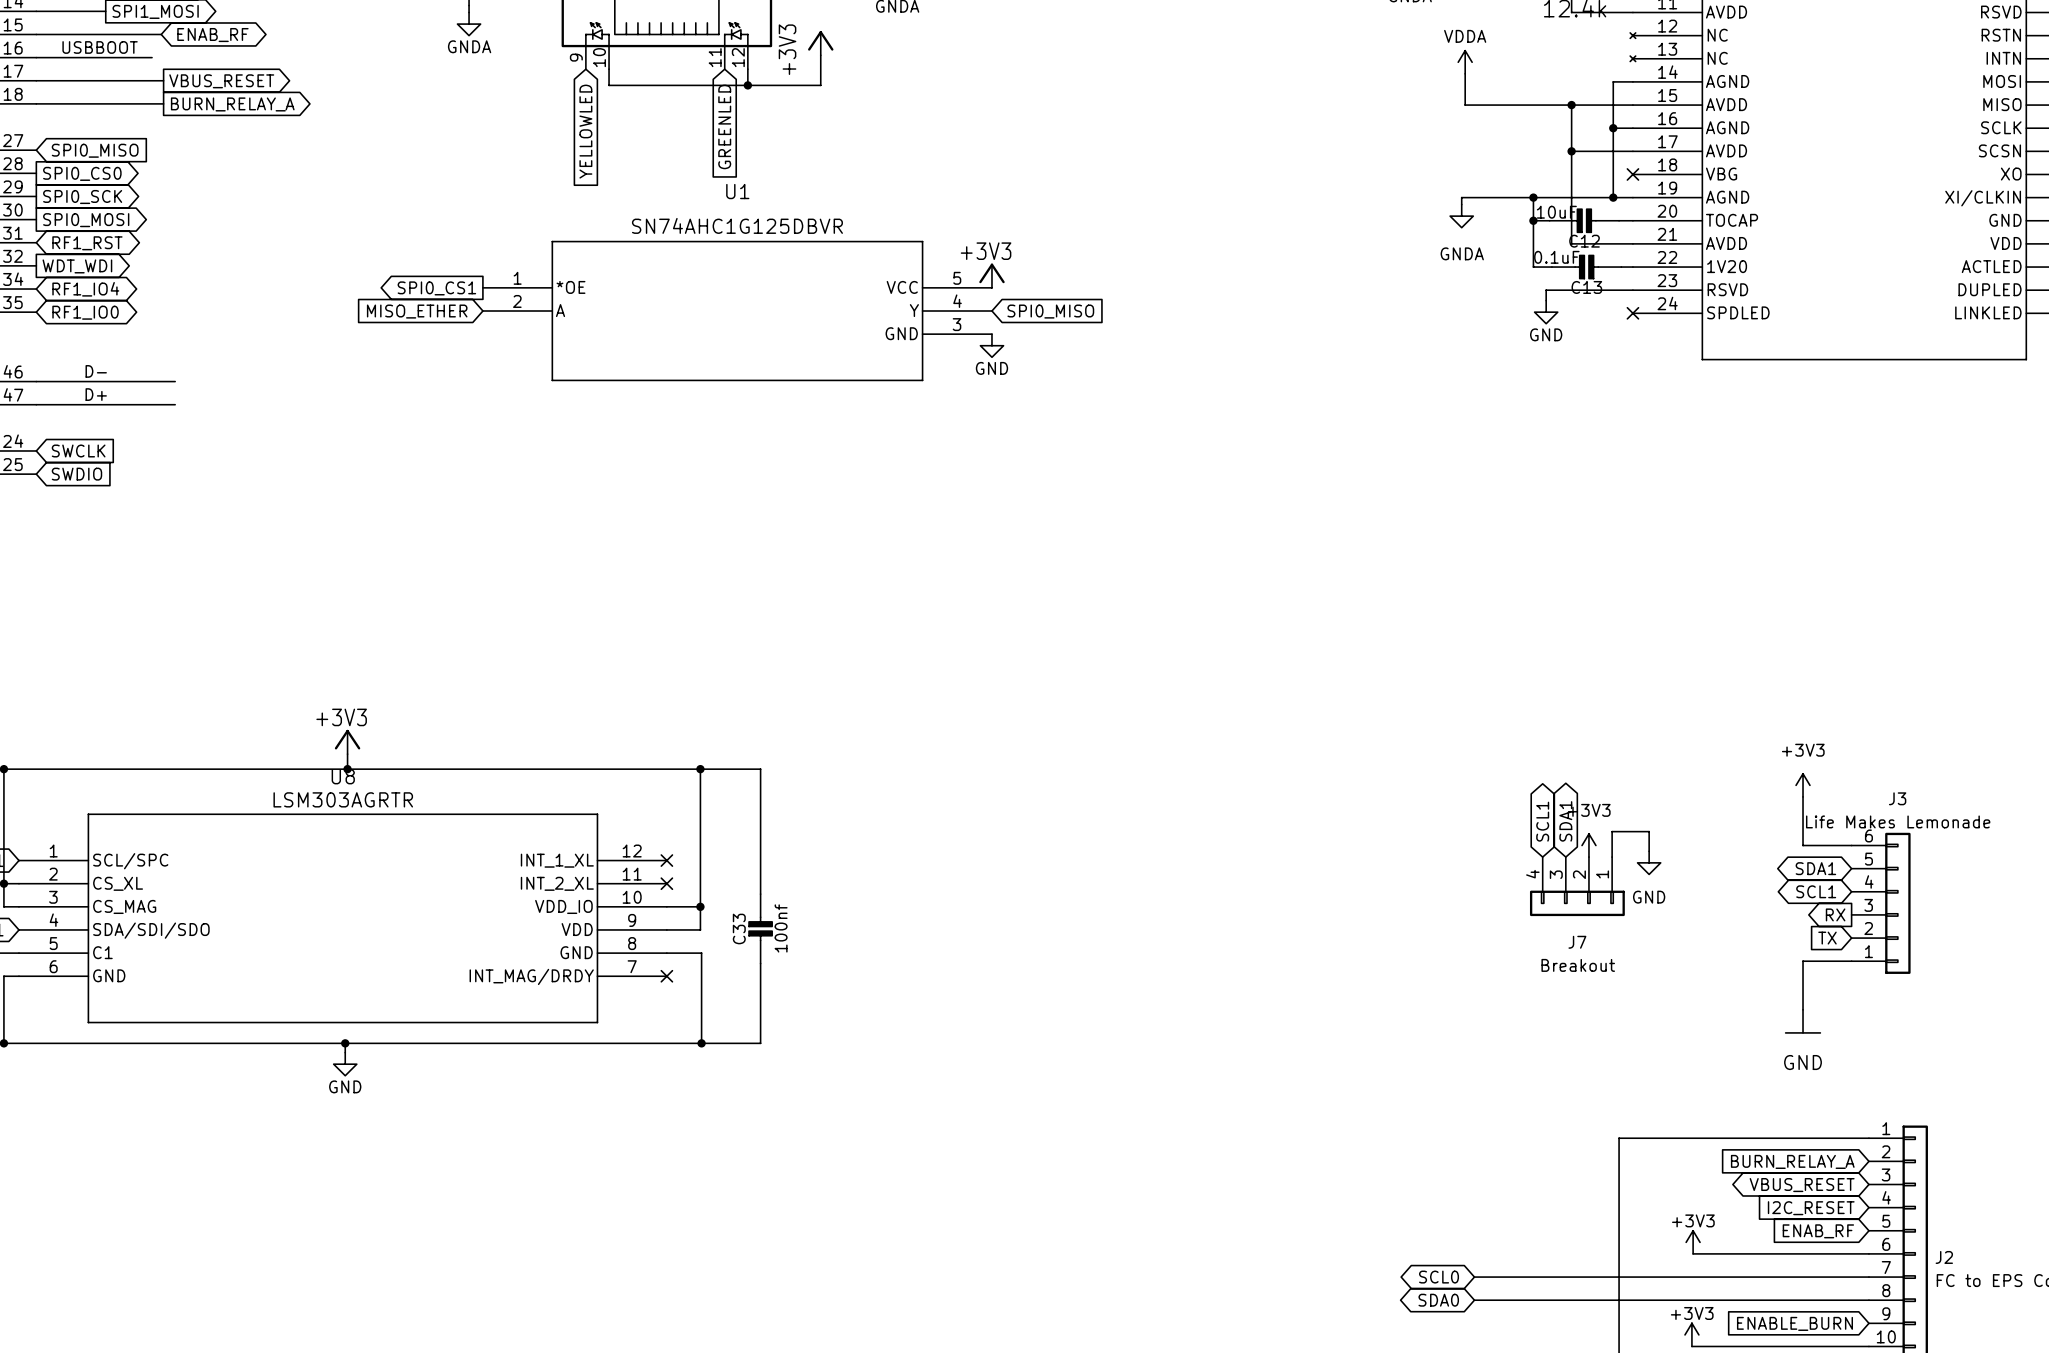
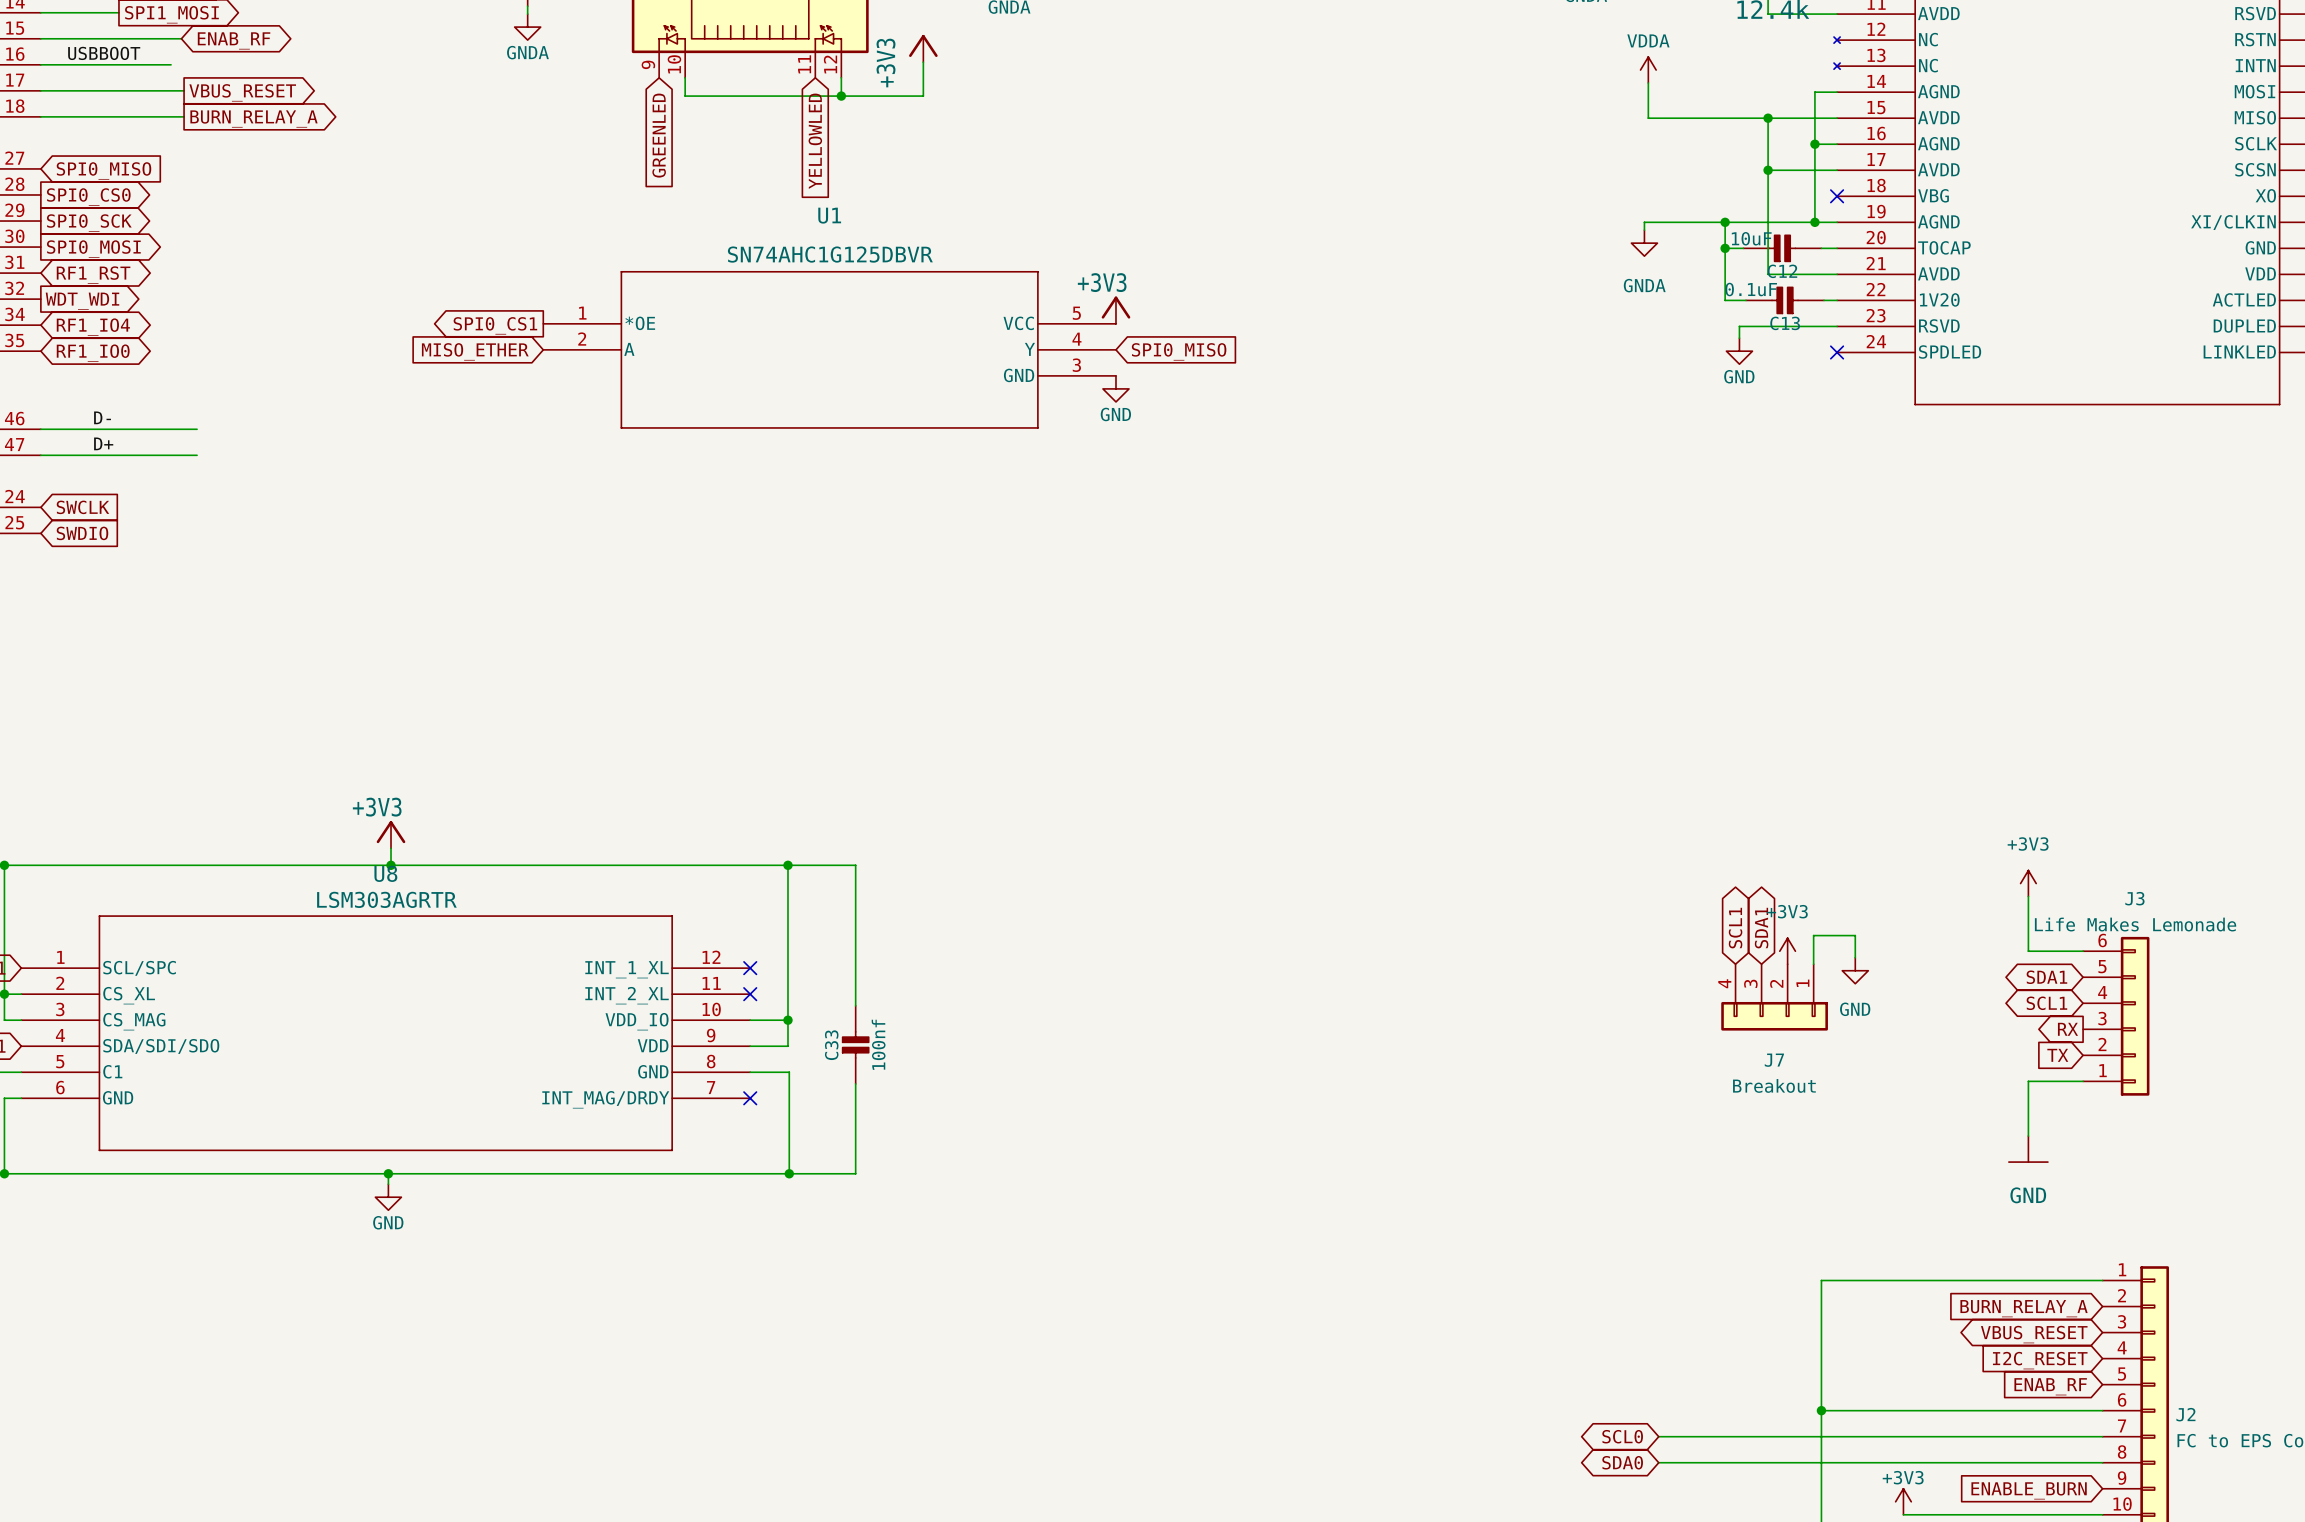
global label: GREENLED (724, 126) -> YELLOWLED (815, 141)
global label: YELLOWLED (585, 131) -> GREENLED (659, 135)
power symbol: +3V3 (1693, 1242) -> none
wire: none -> (1821, 1410) (1904, 1410)
junction: none -> (1821, 1410)

